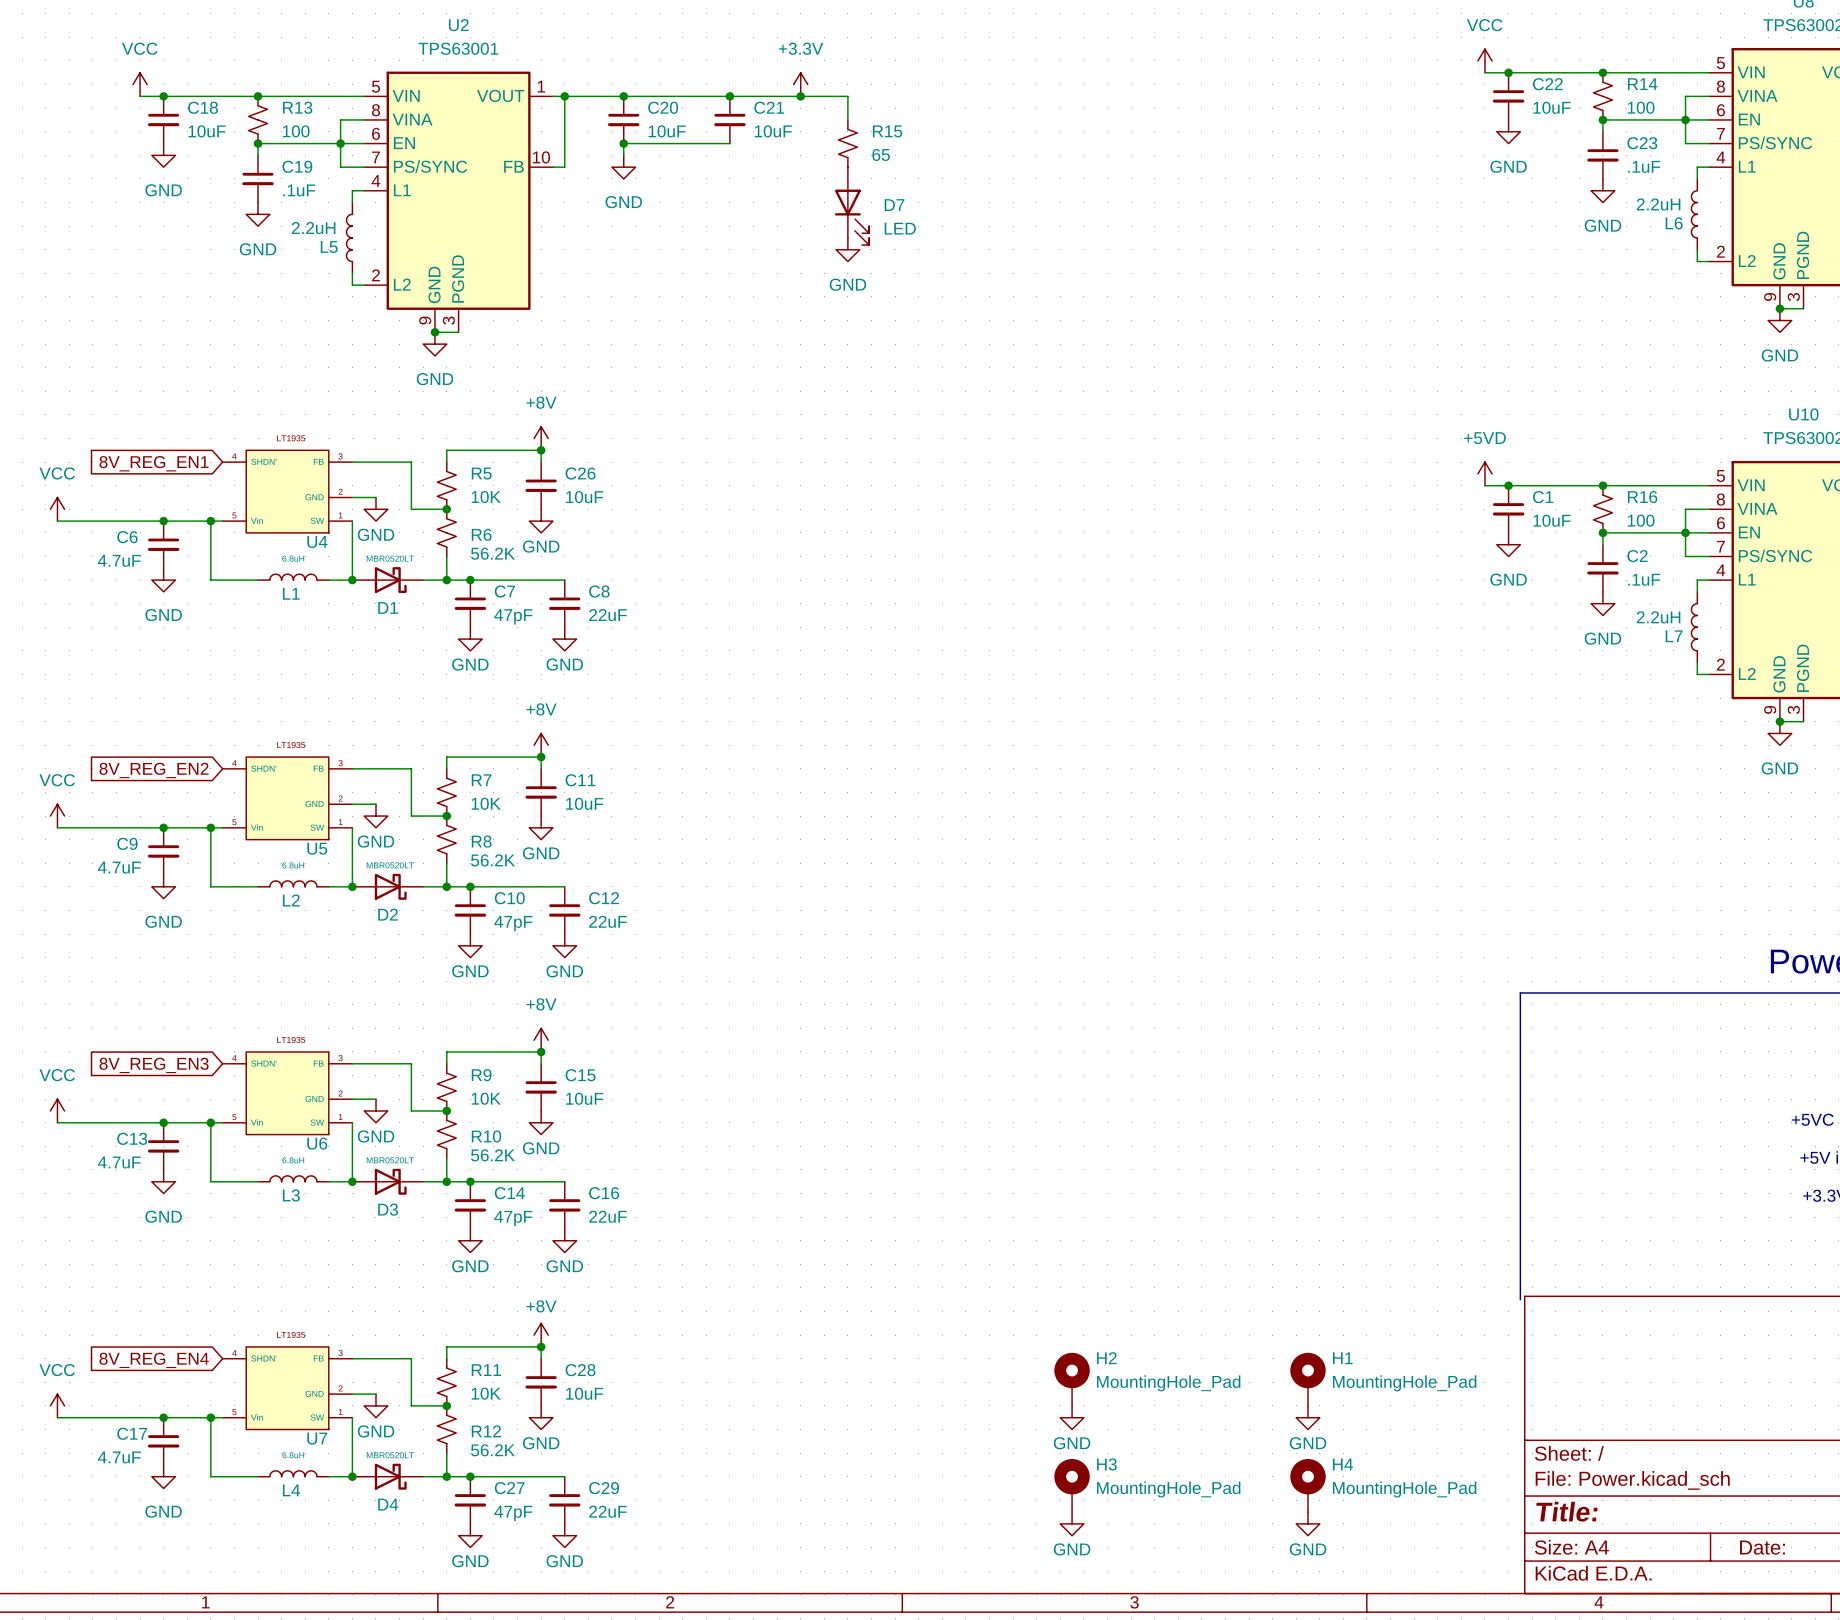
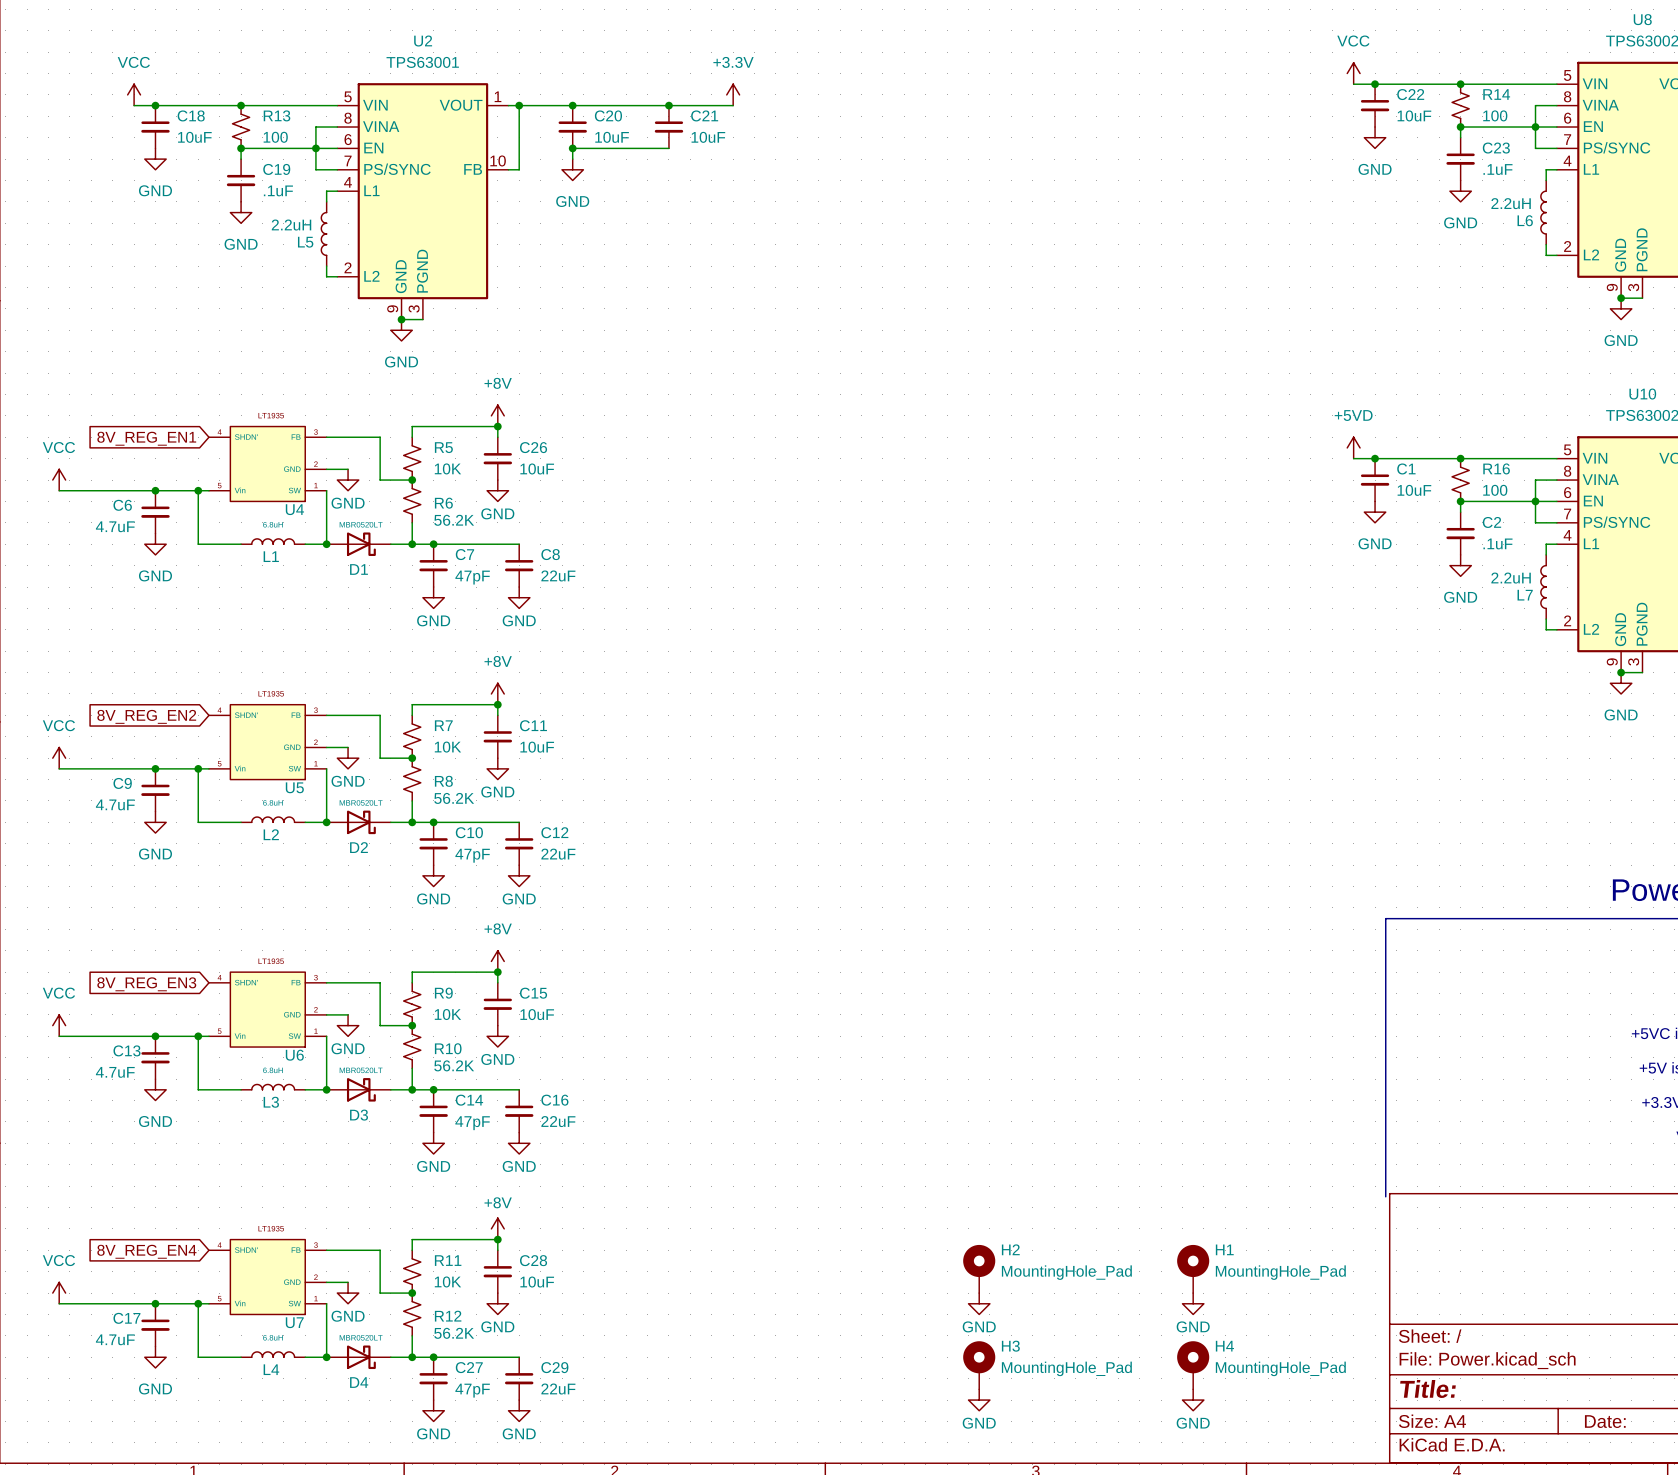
wire: (800, 96) (847, 96) (847, 119) -> none
junction: (800, 96) -> none
R15: 65 (847, 143) -> none
D7: LED (852, 206) -> none
power symbol: GND (847, 249) -> none

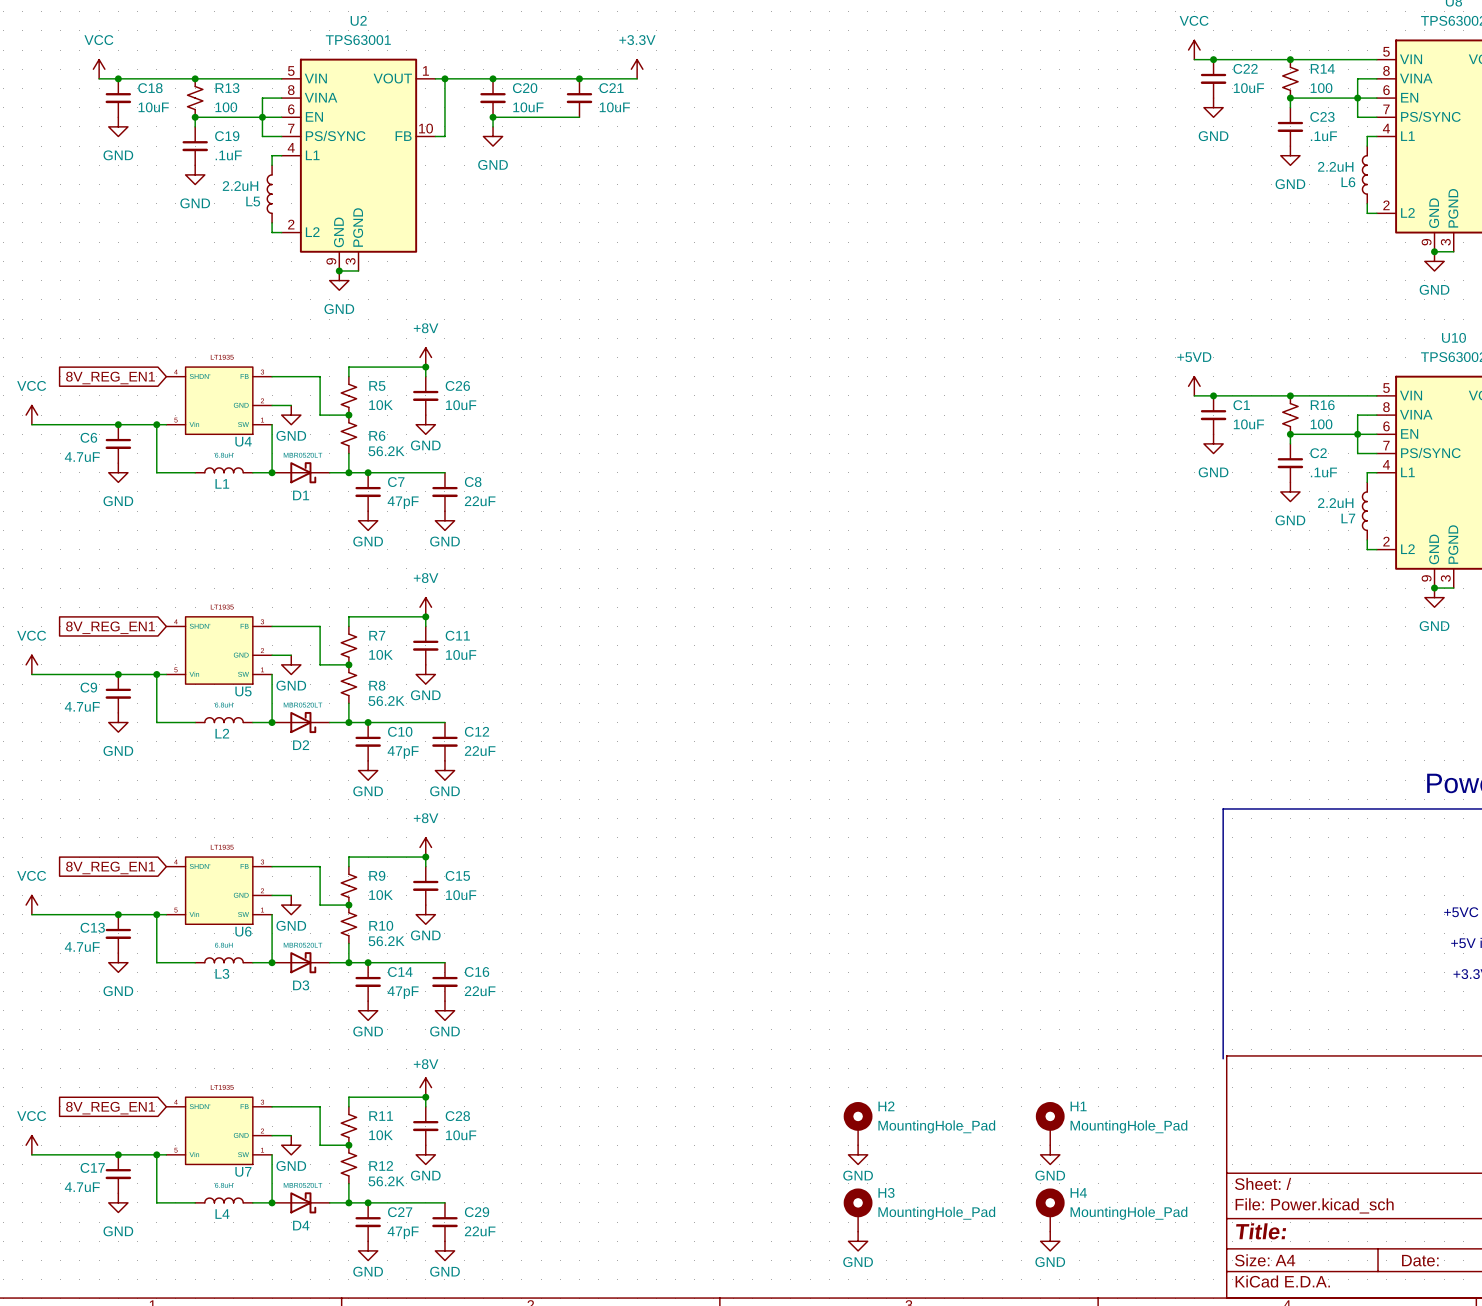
global label: 8V_REG_EN2 (146, 716) -> 8V_REG_EN1 (110, 627)
global label: 8V_REG_EN3 (146, 984) -> 8V_REG_EN1 (110, 867)
global label: 8V_REG_EN4 (146, 1251) -> 8V_REG_EN1 (110, 1108)

